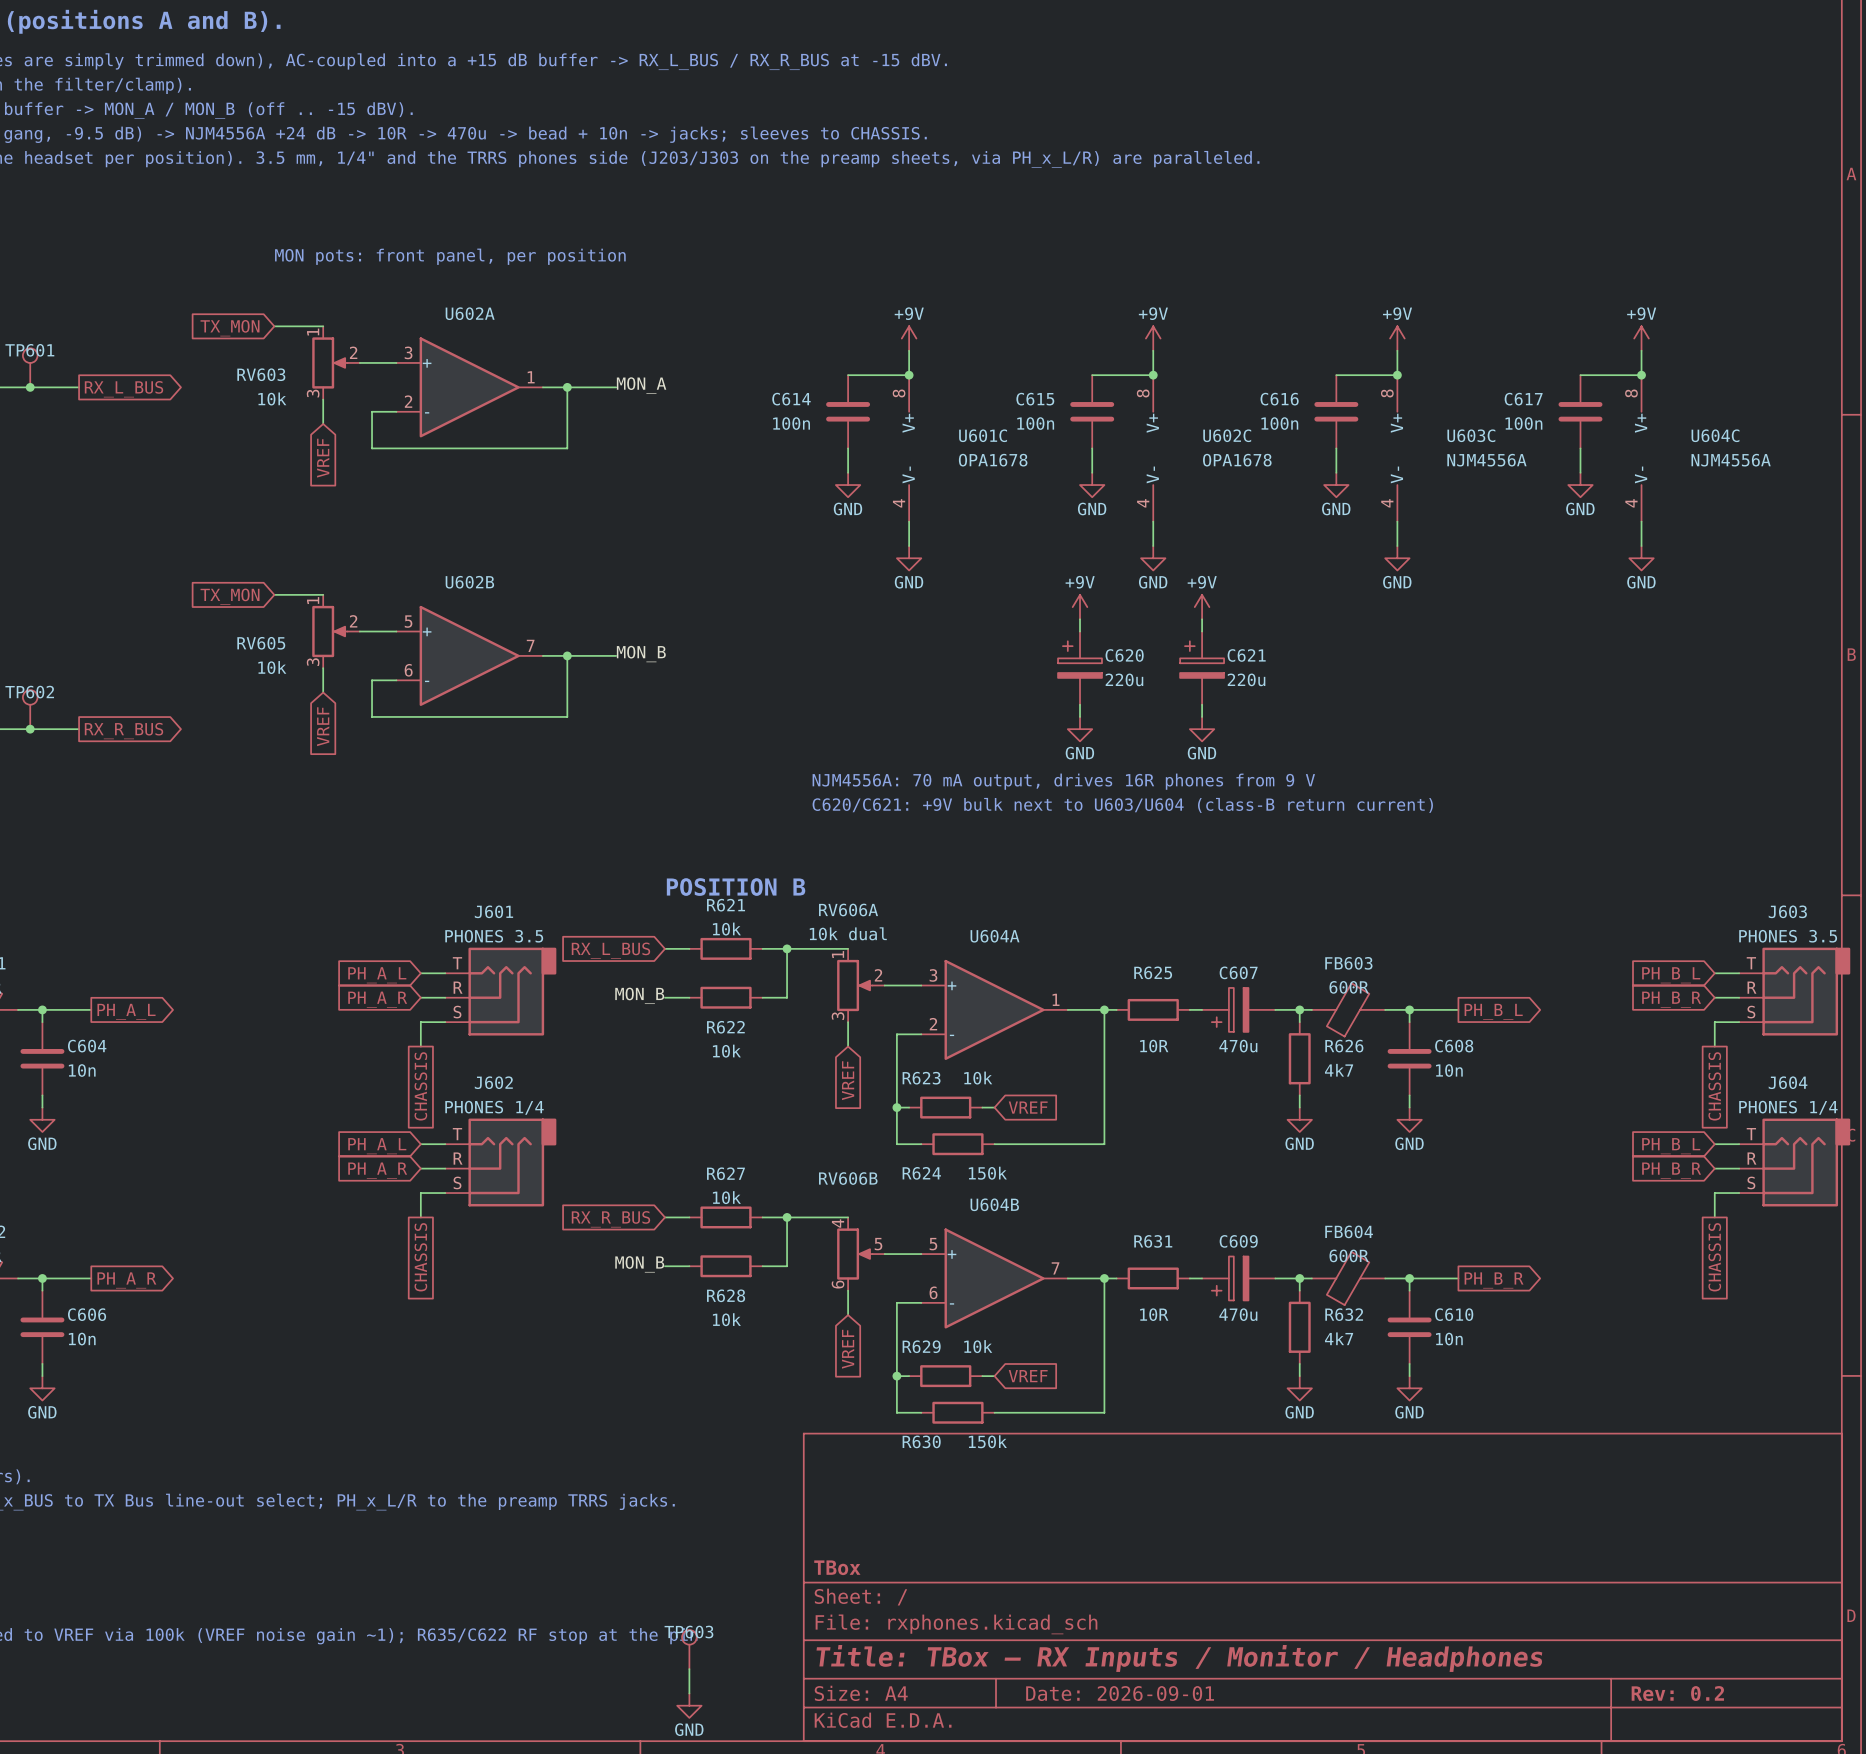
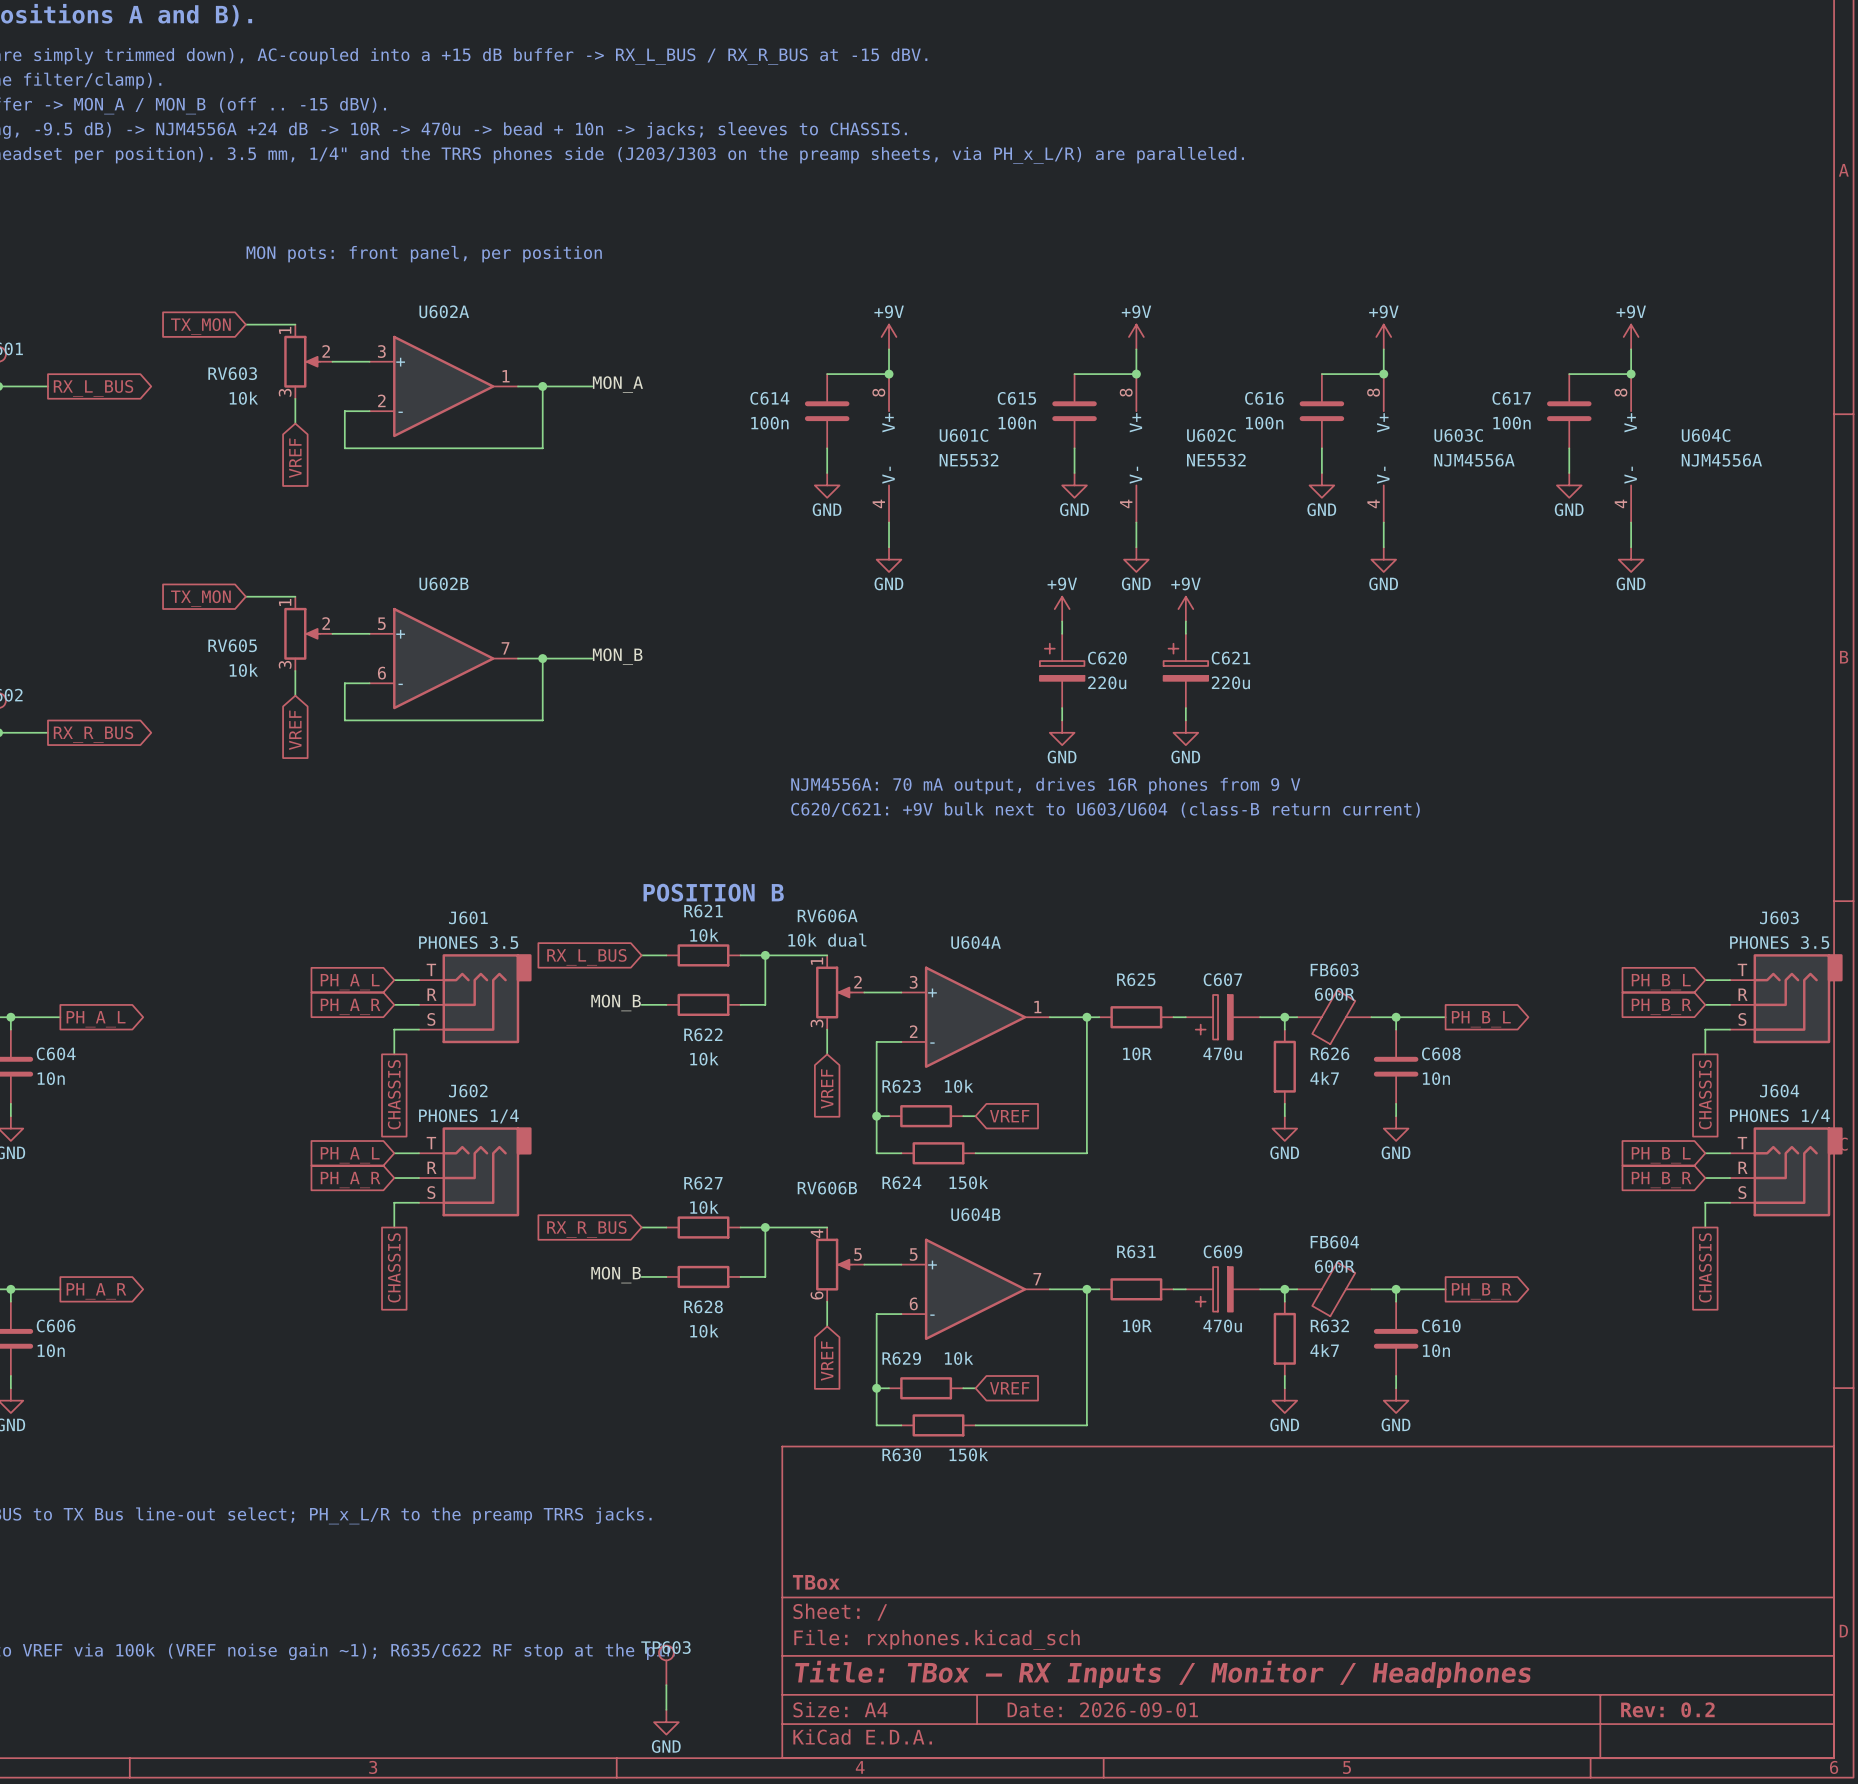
U601C value: OPA1678 (993, 460) -> NE5532 (968, 460)
U602C value: OPA1678 (1237, 460) -> NE5532 (1216, 460)

